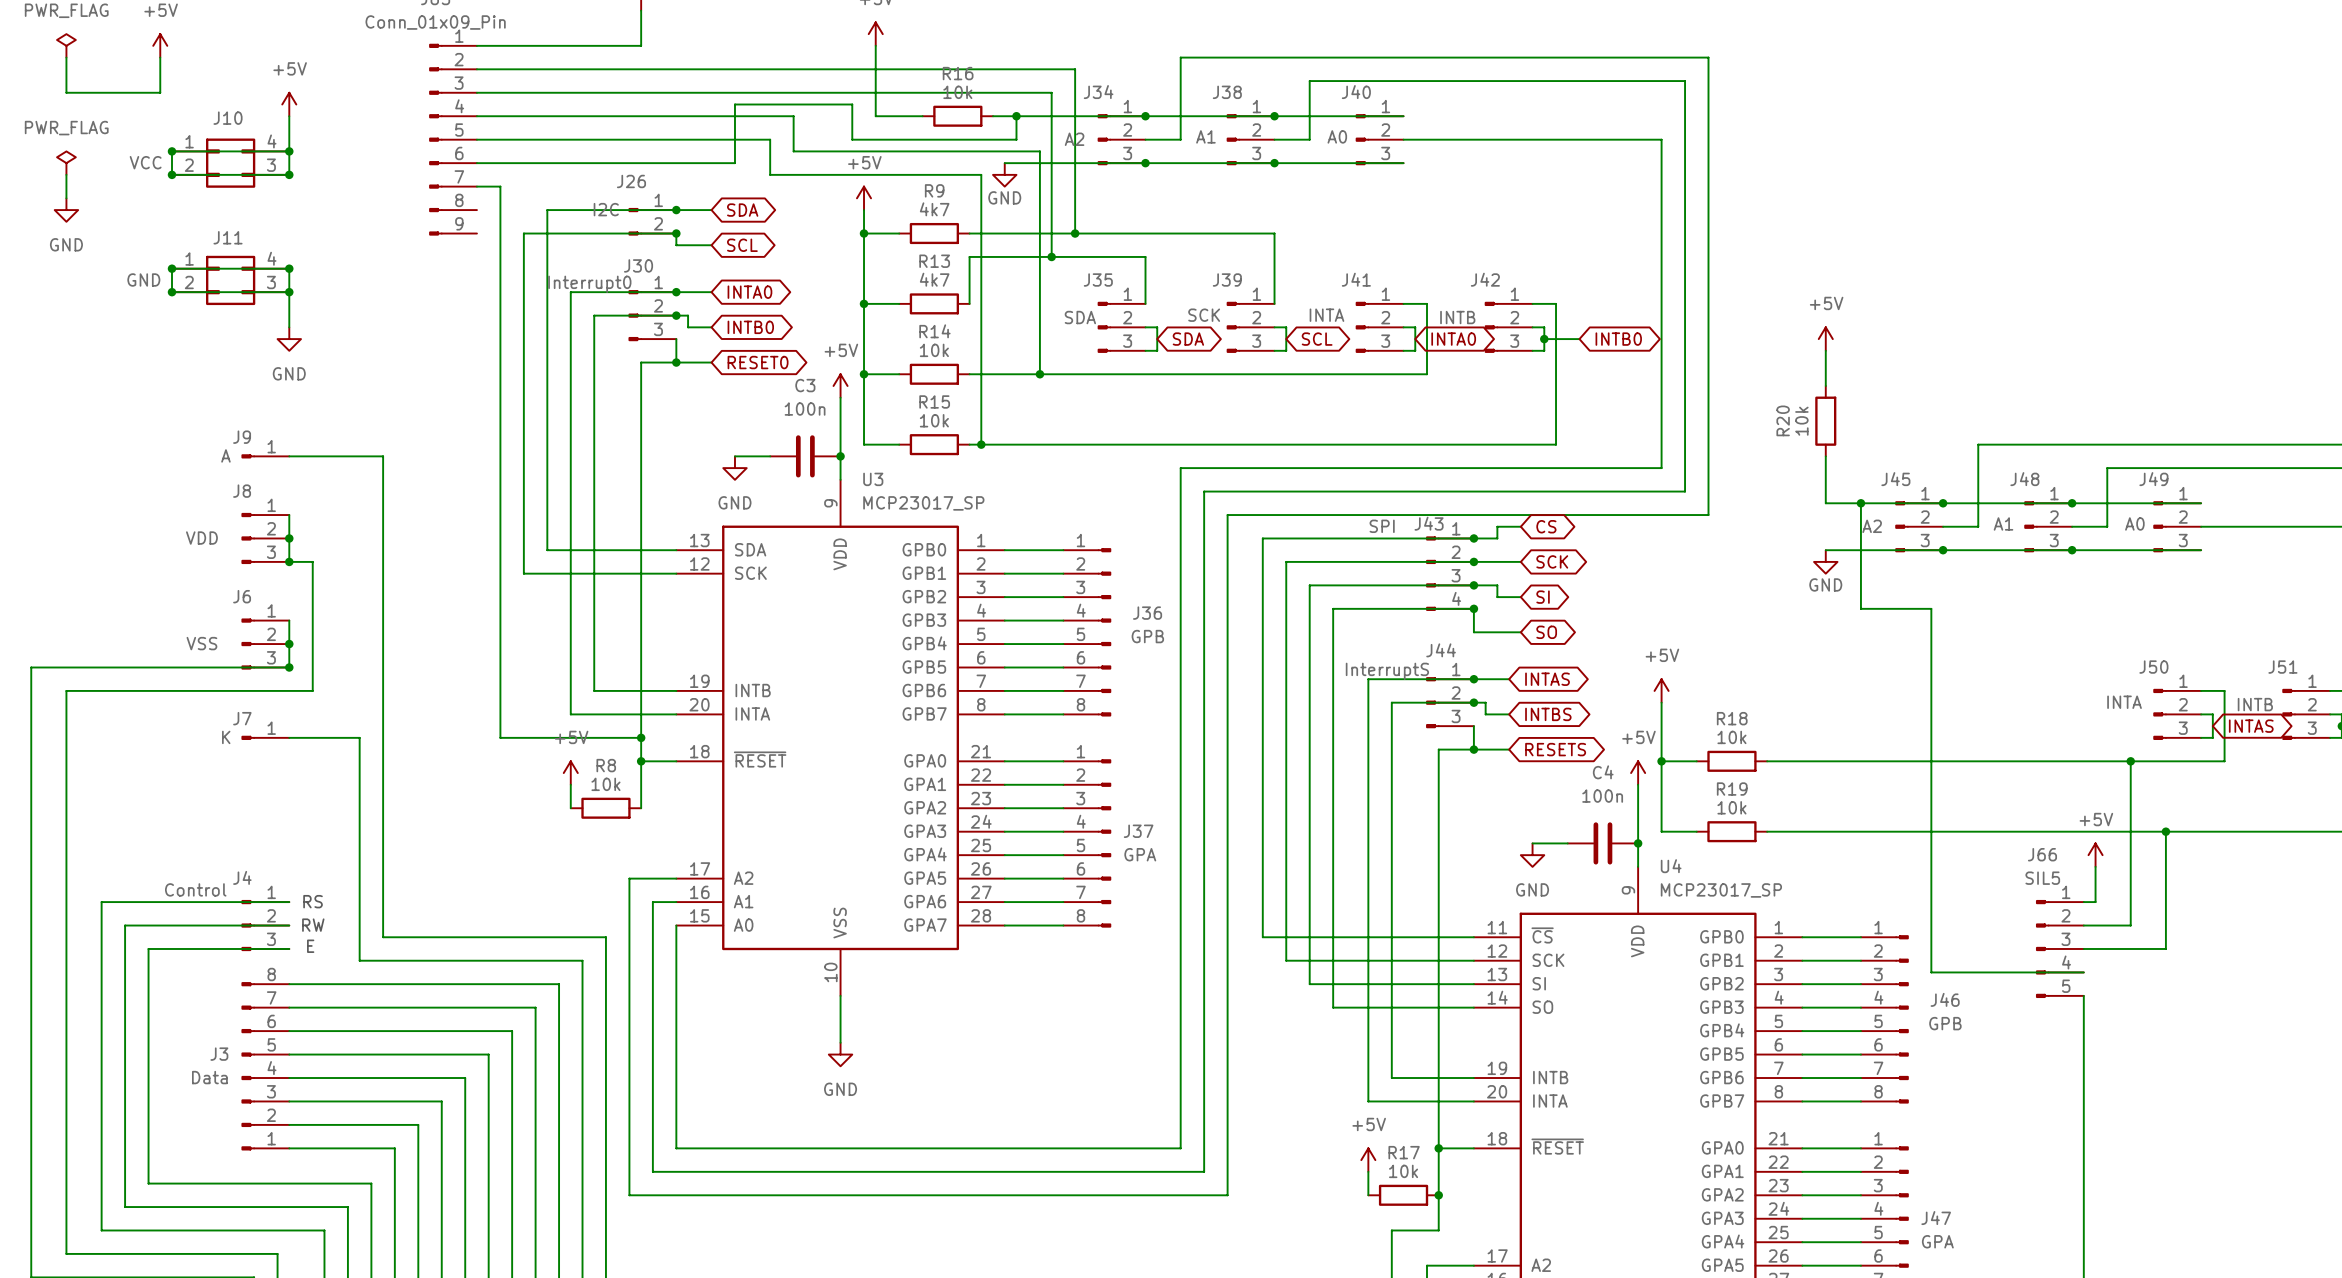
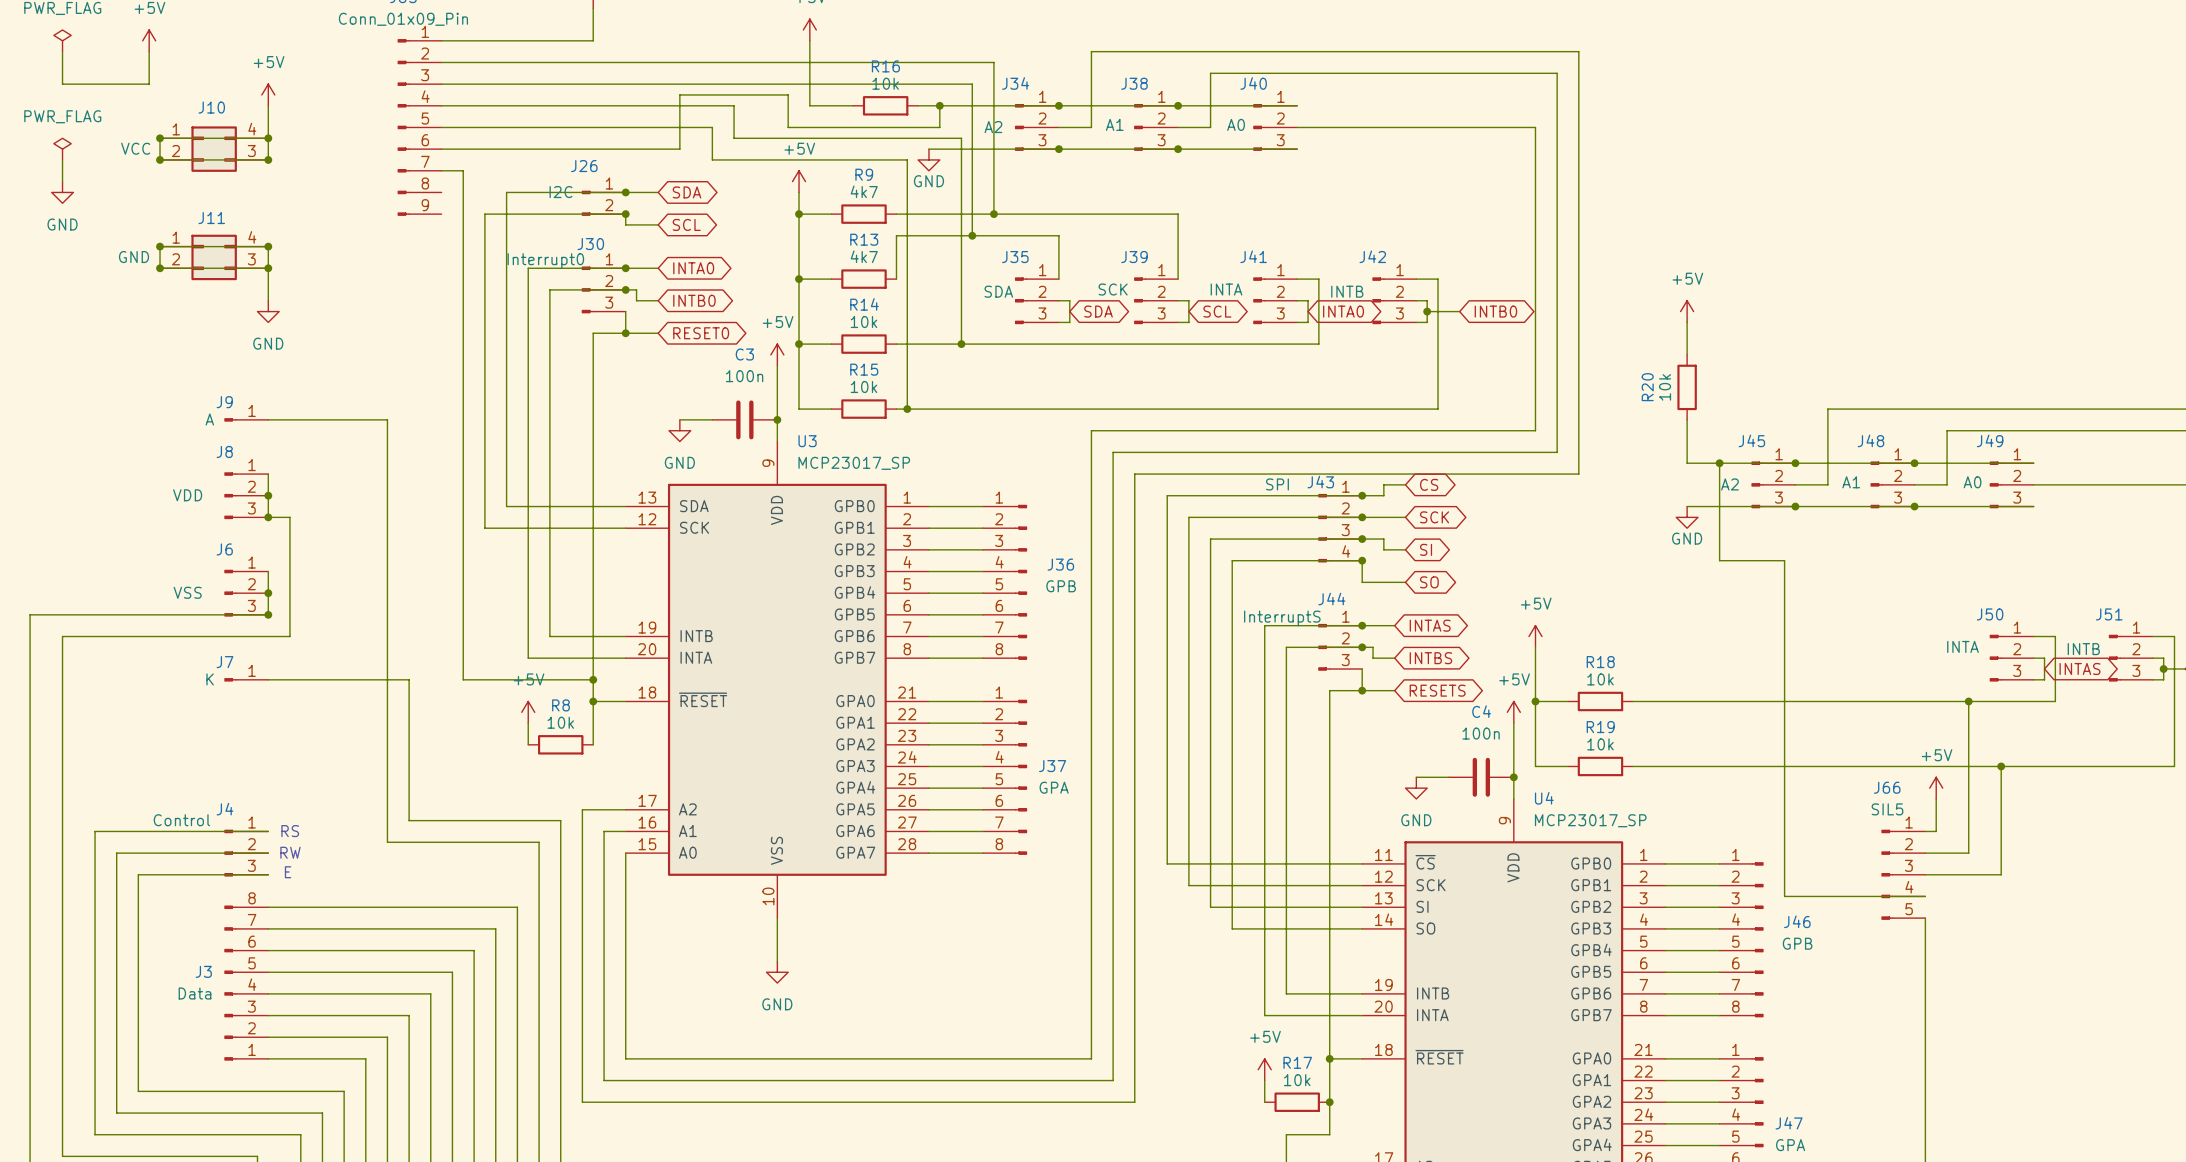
wire: (383, 456) (383, 937) (605, 937) -> (354, 419) (387, 419) (387, 842) (539, 842) (539, 885)
wire: (359, 737) (359, 960) (582, 960) -> (333, 679) (409, 679) (409, 820) (560, 820) (560, 863)

